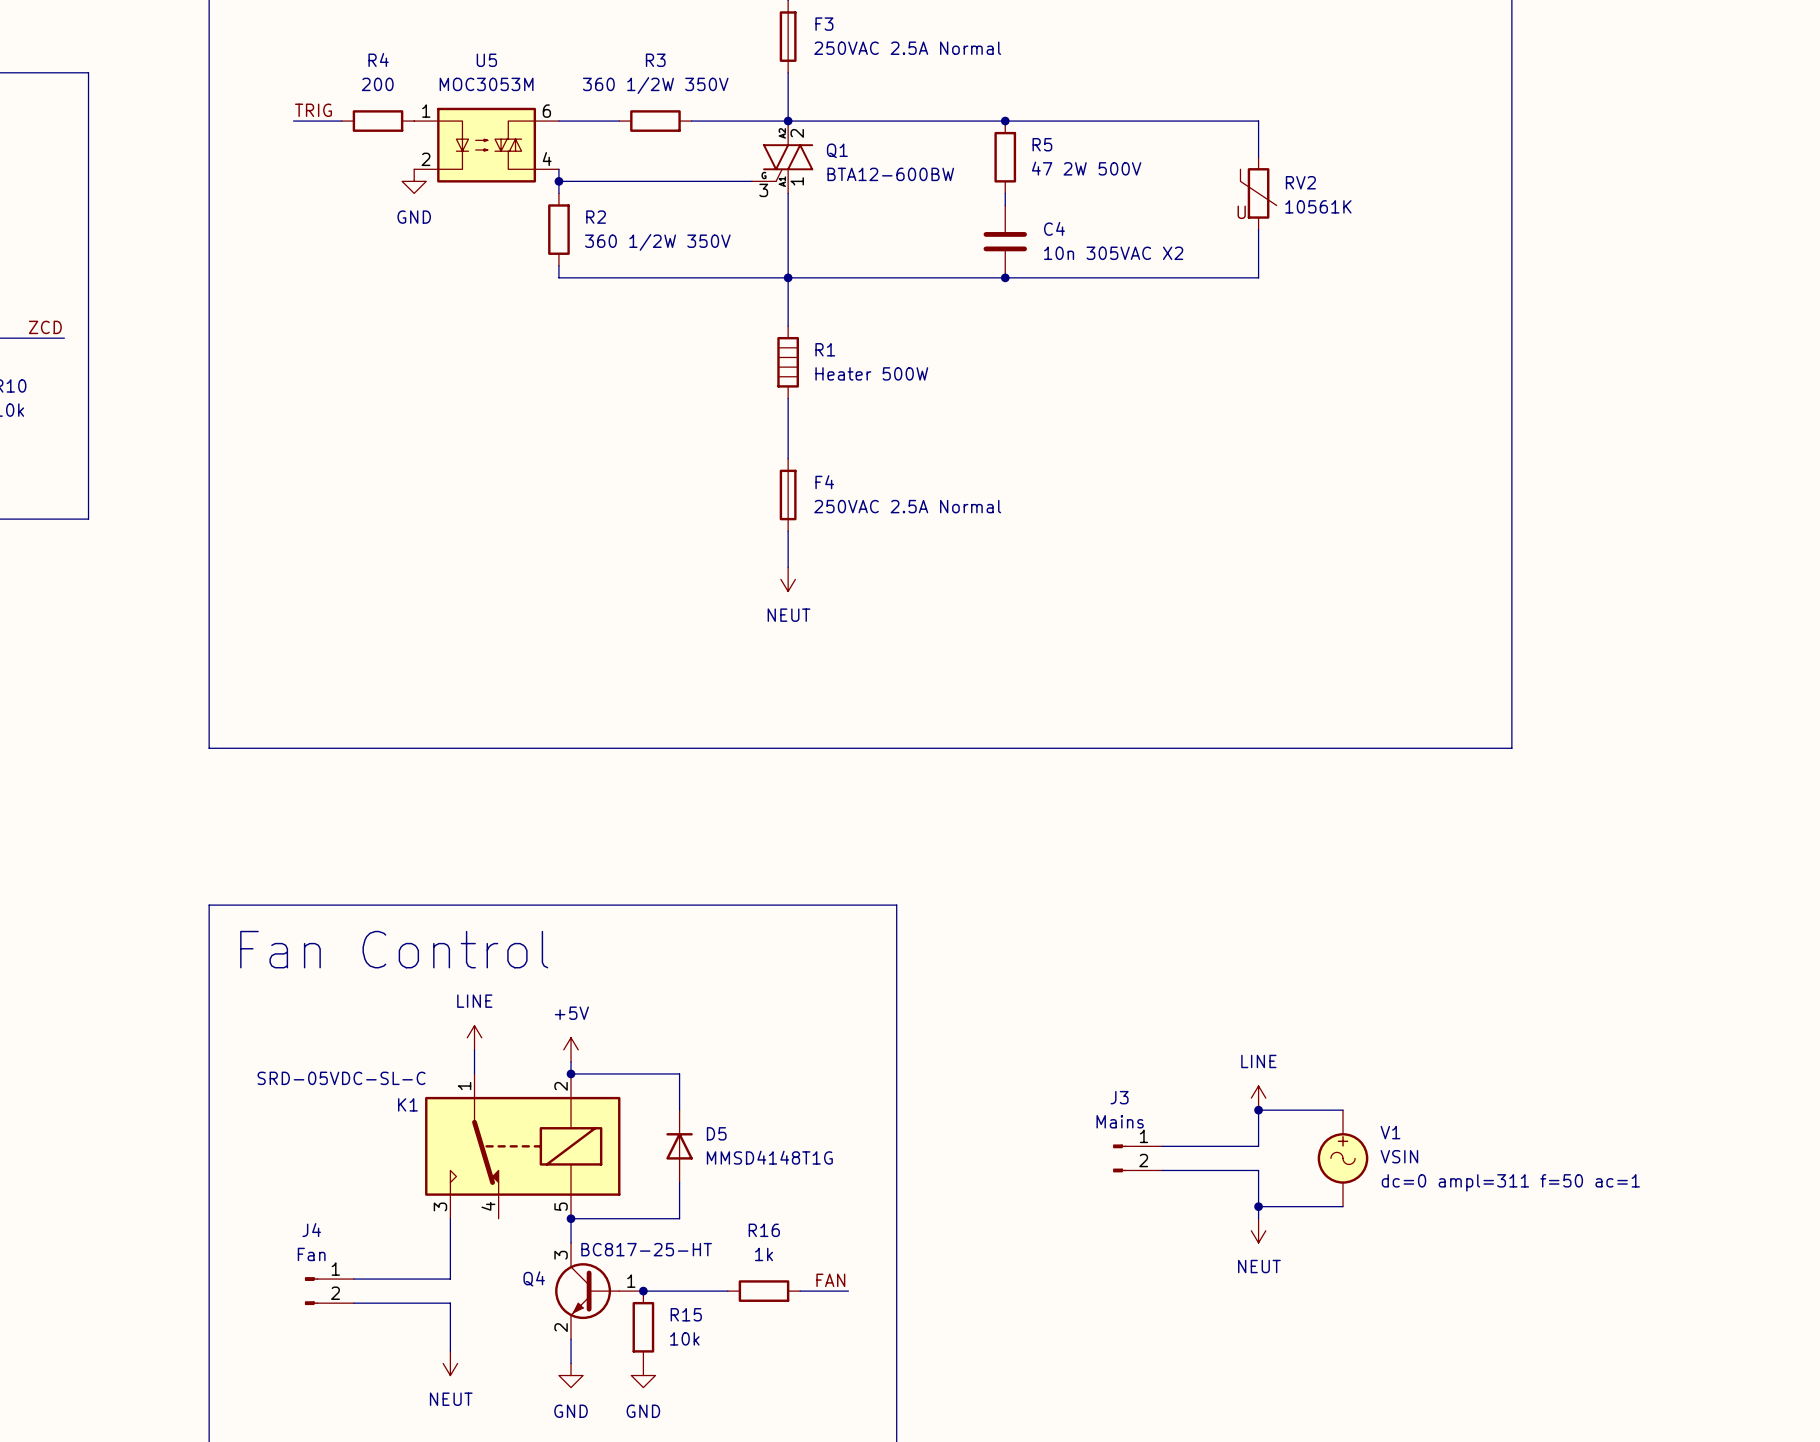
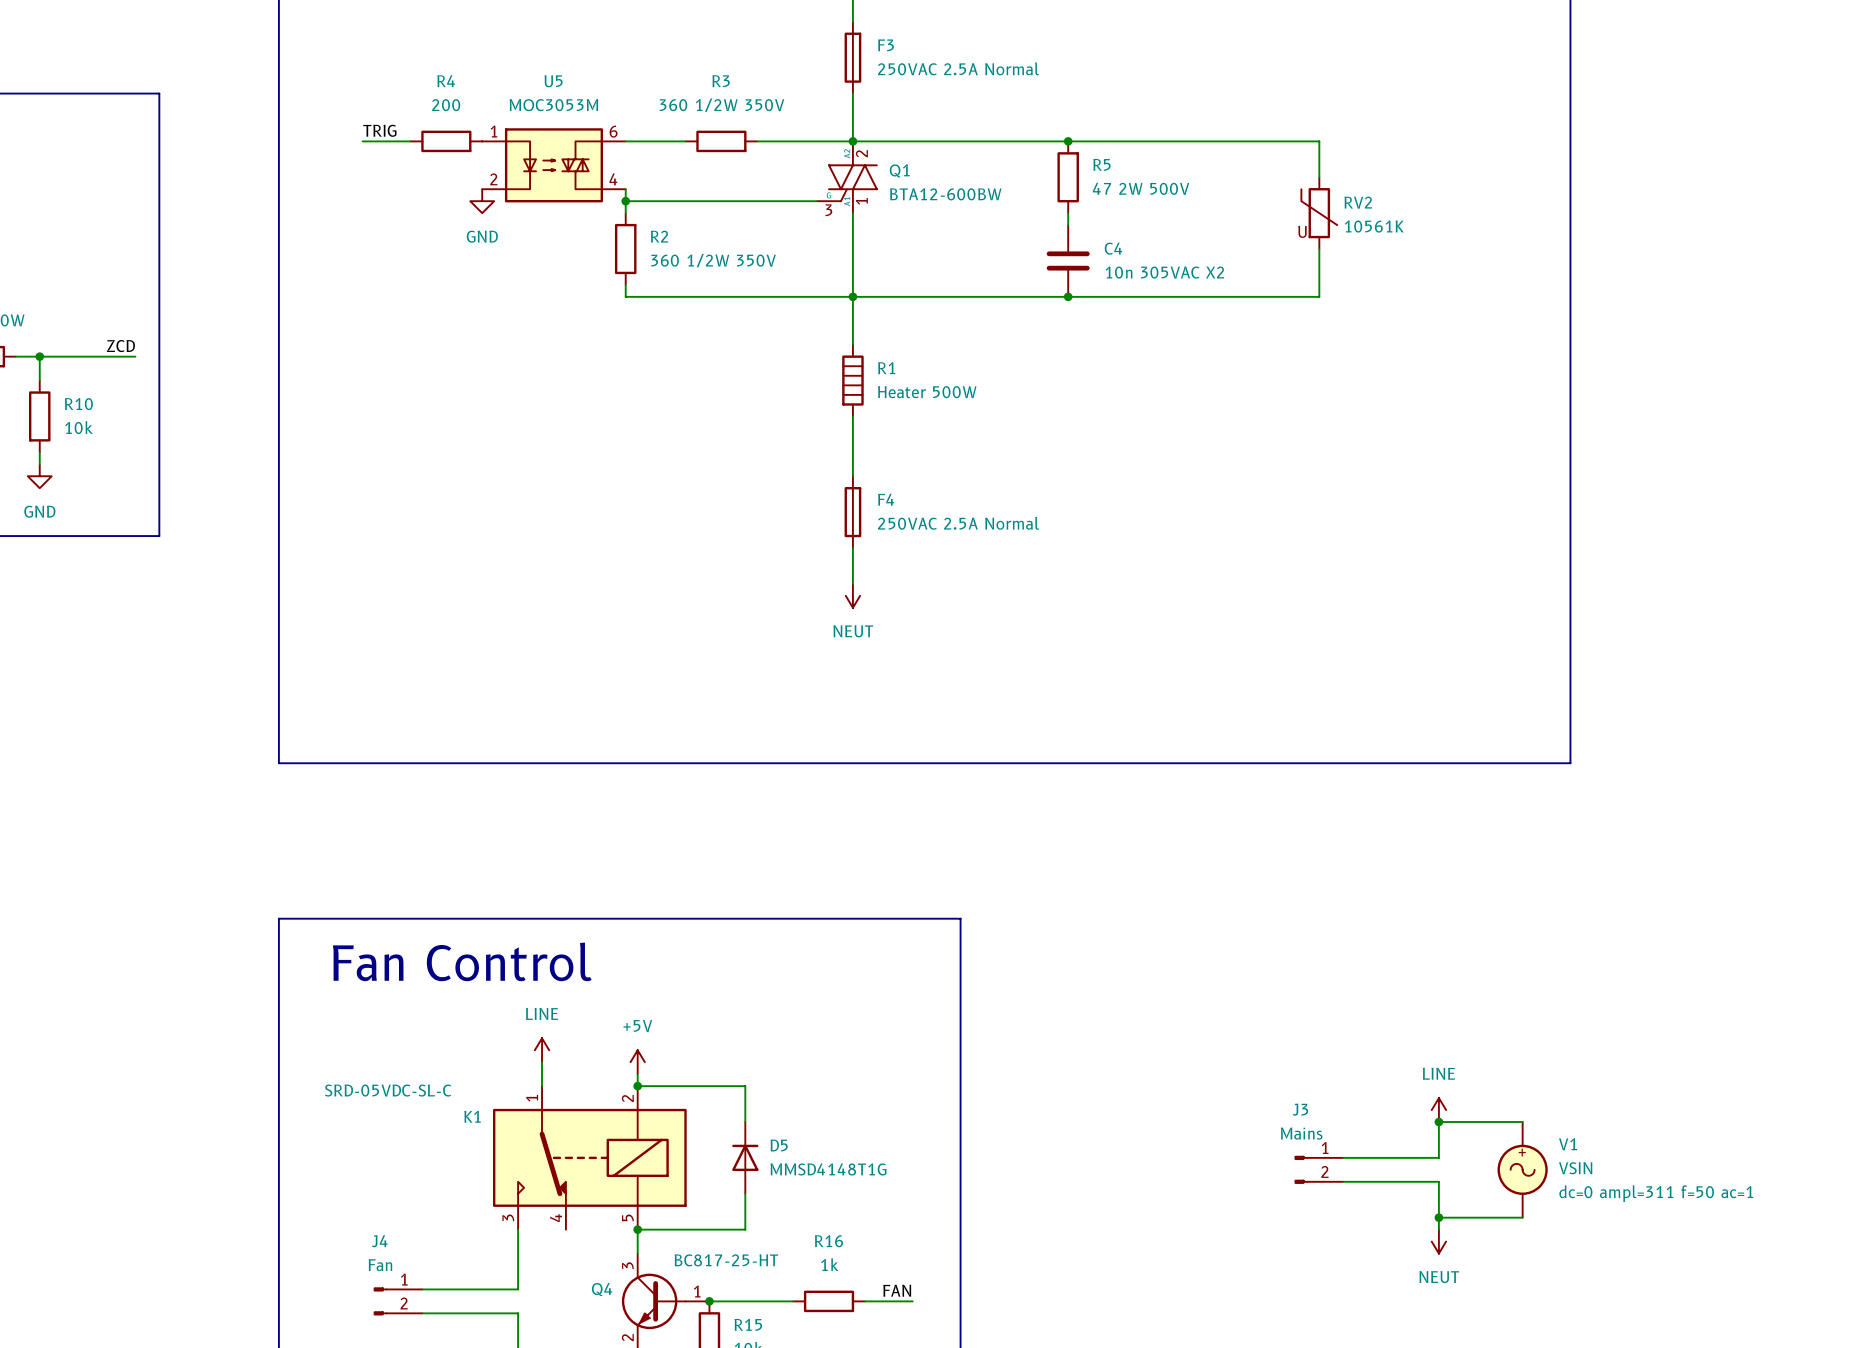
power symbol position: LINE (1258, 1098) -> LINE (1438, 1110)
junction: (1258, 1110) -> none
wire: (1343, 1110) (1258, 1110) (1258, 1146) (1162, 1146) -> (1522, 1122) (1438, 1122) (1438, 1157) (1343, 1157)
junction: none -> (1438, 1122)
J3 position: (1137, 1158) -> (1318, 1169)
V1 position: (1343, 1158) -> (1522, 1169)
wire: (1162, 1170) (1258, 1170) (1258, 1218) -> (1343, 1181) (1438, 1181) (1438, 1229)
wire: (1258, 1206) (1343, 1206) -> (1438, 1217) (1522, 1217)
junction: (1258, 1206) -> none
junction: none -> (1438, 1217)
power symbol position: NEUT (1258, 1230) -> NEUT (1438, 1241)

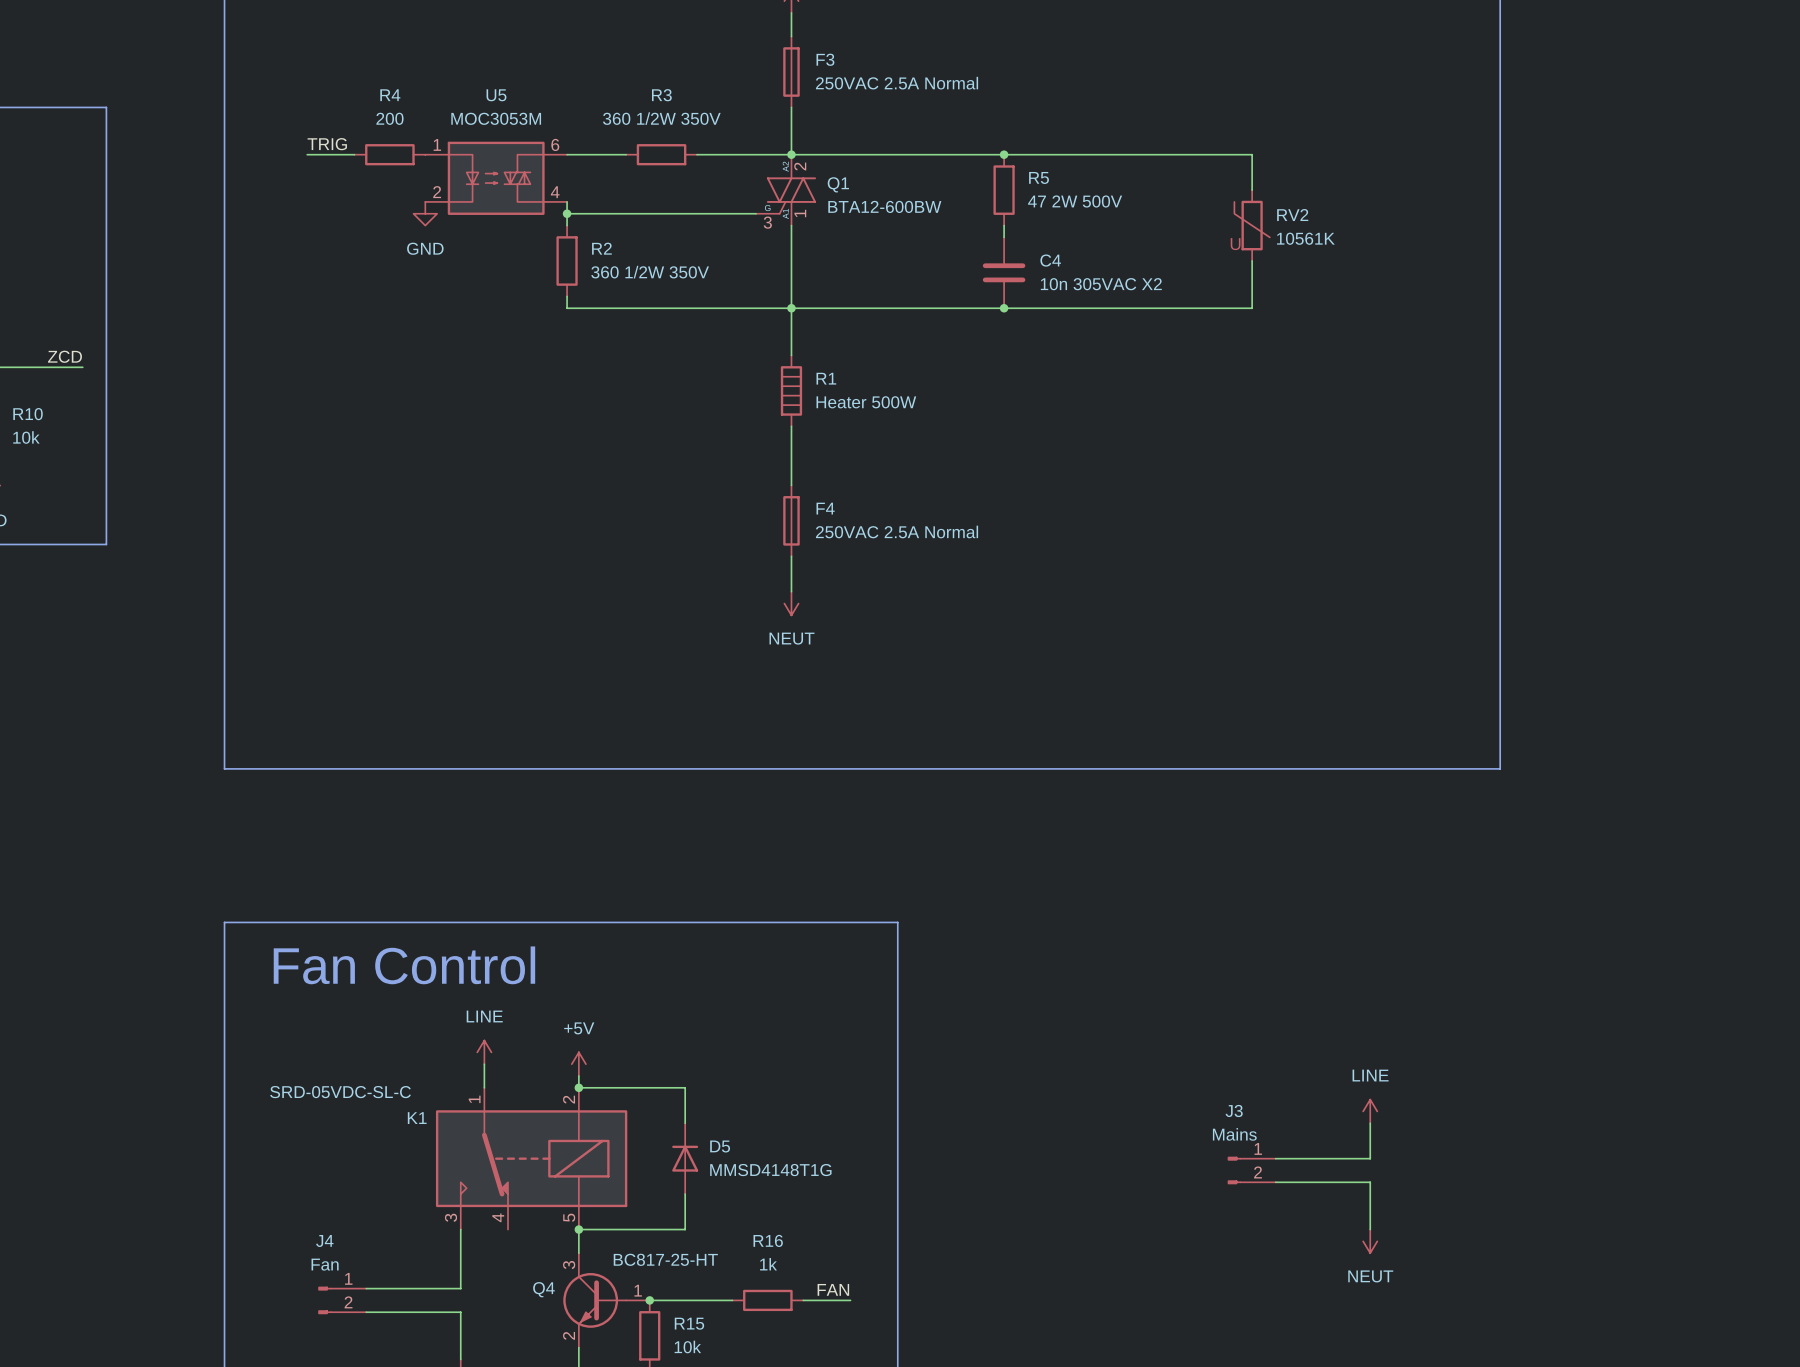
wire: (1438, 1122) (1522, 1122) -> none
junction: (1438, 1122) -> none
V1: VSIN (1522, 1169) -> none
wire: (1438, 1217) (1522, 1217) -> none
junction: (1438, 1217) -> none

